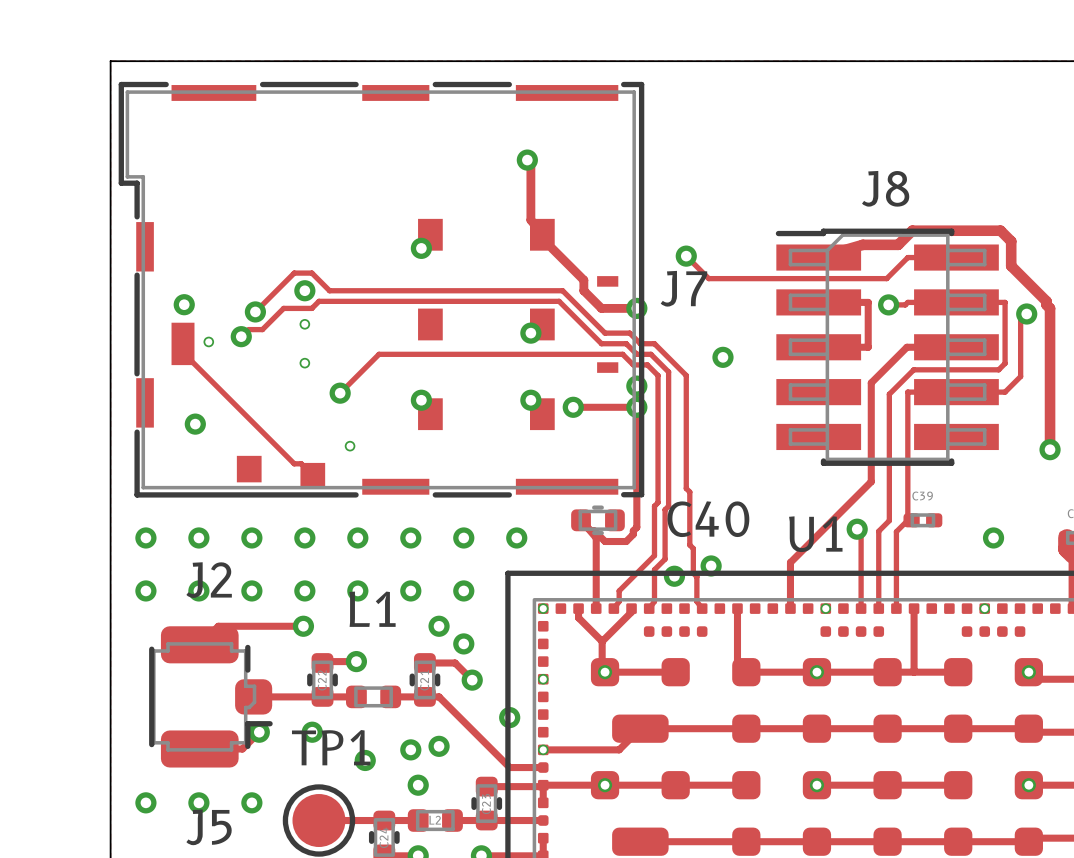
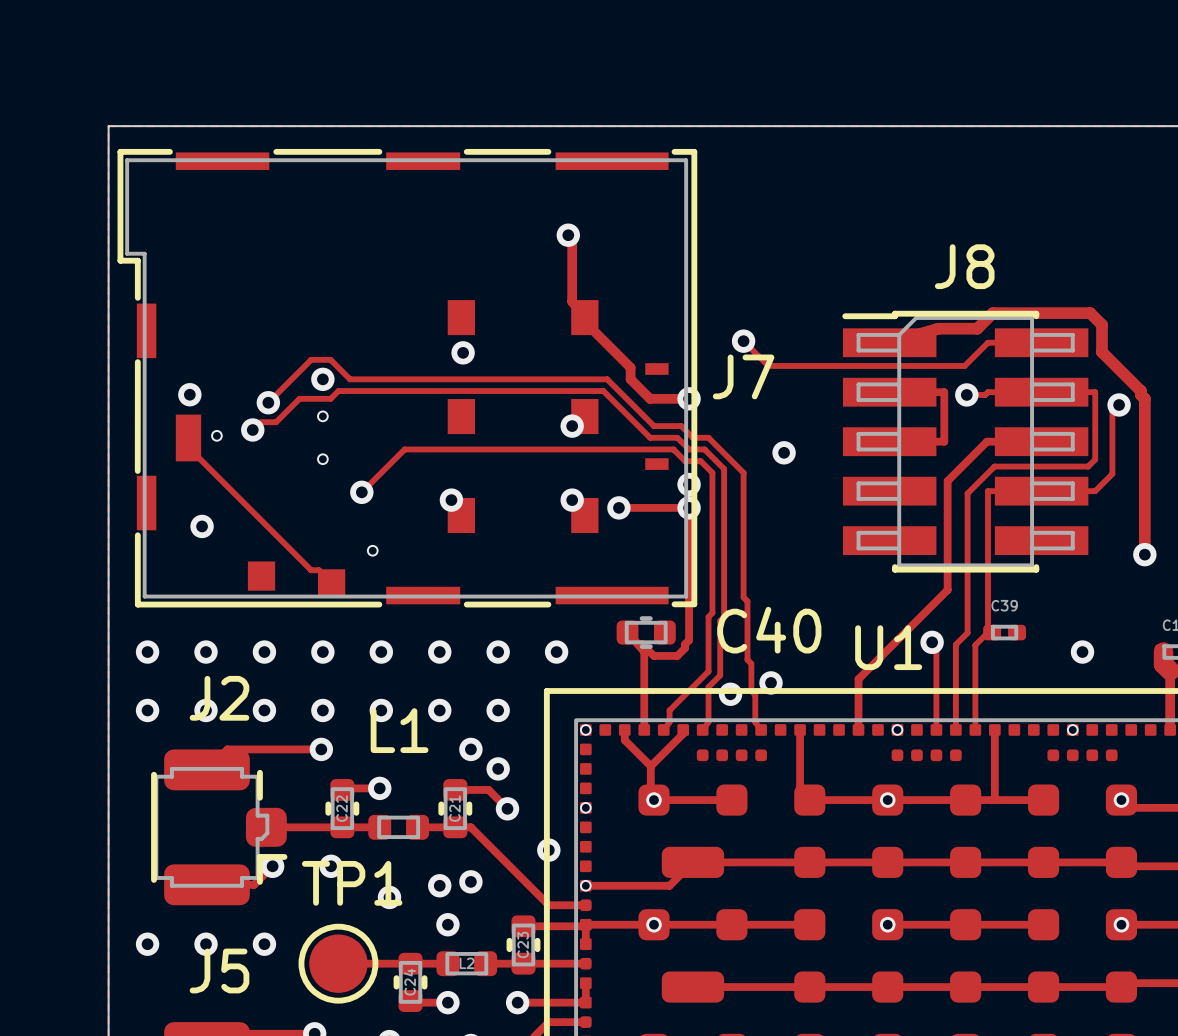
via position: (421, 248) -> (463, 352)

